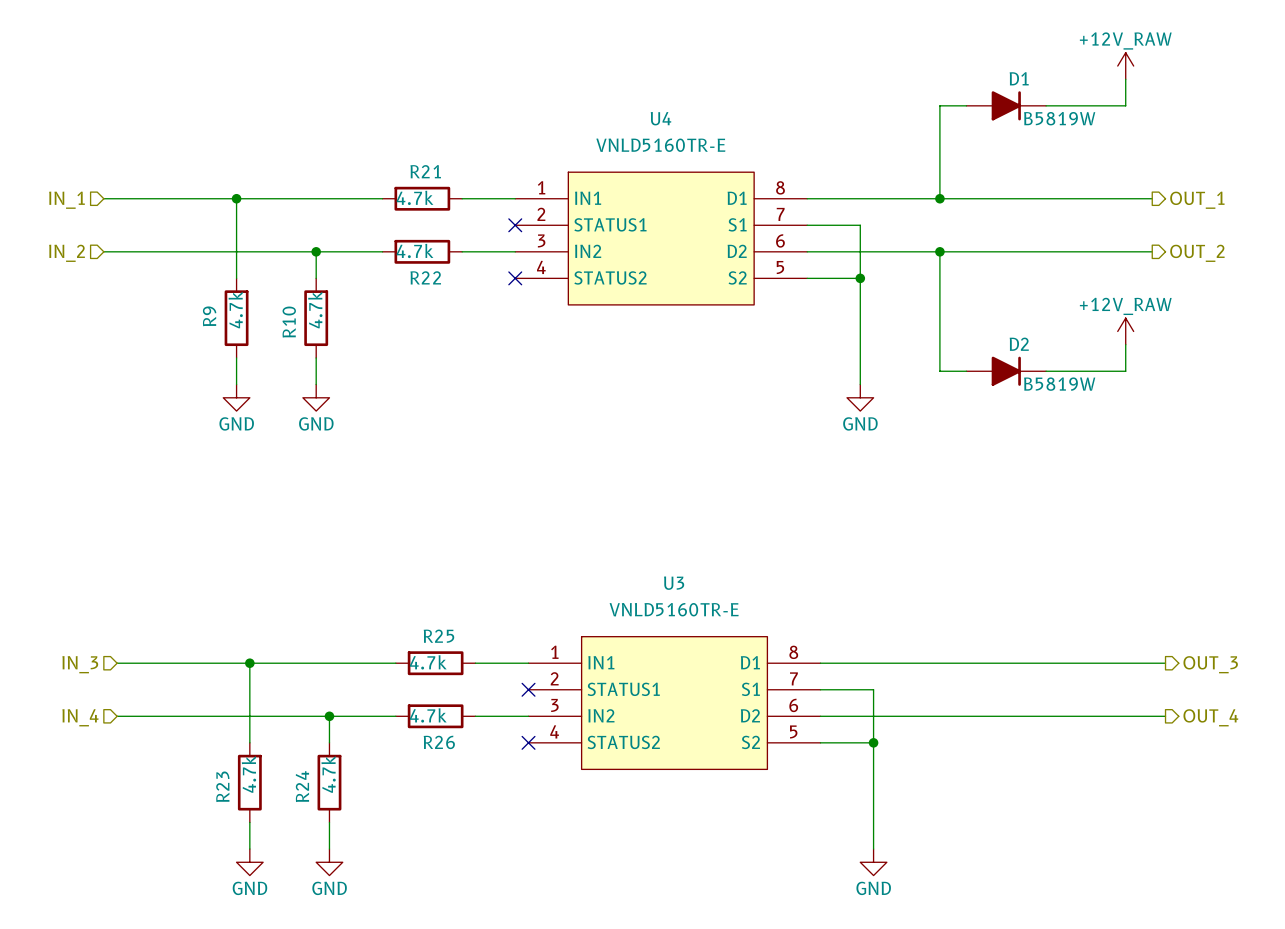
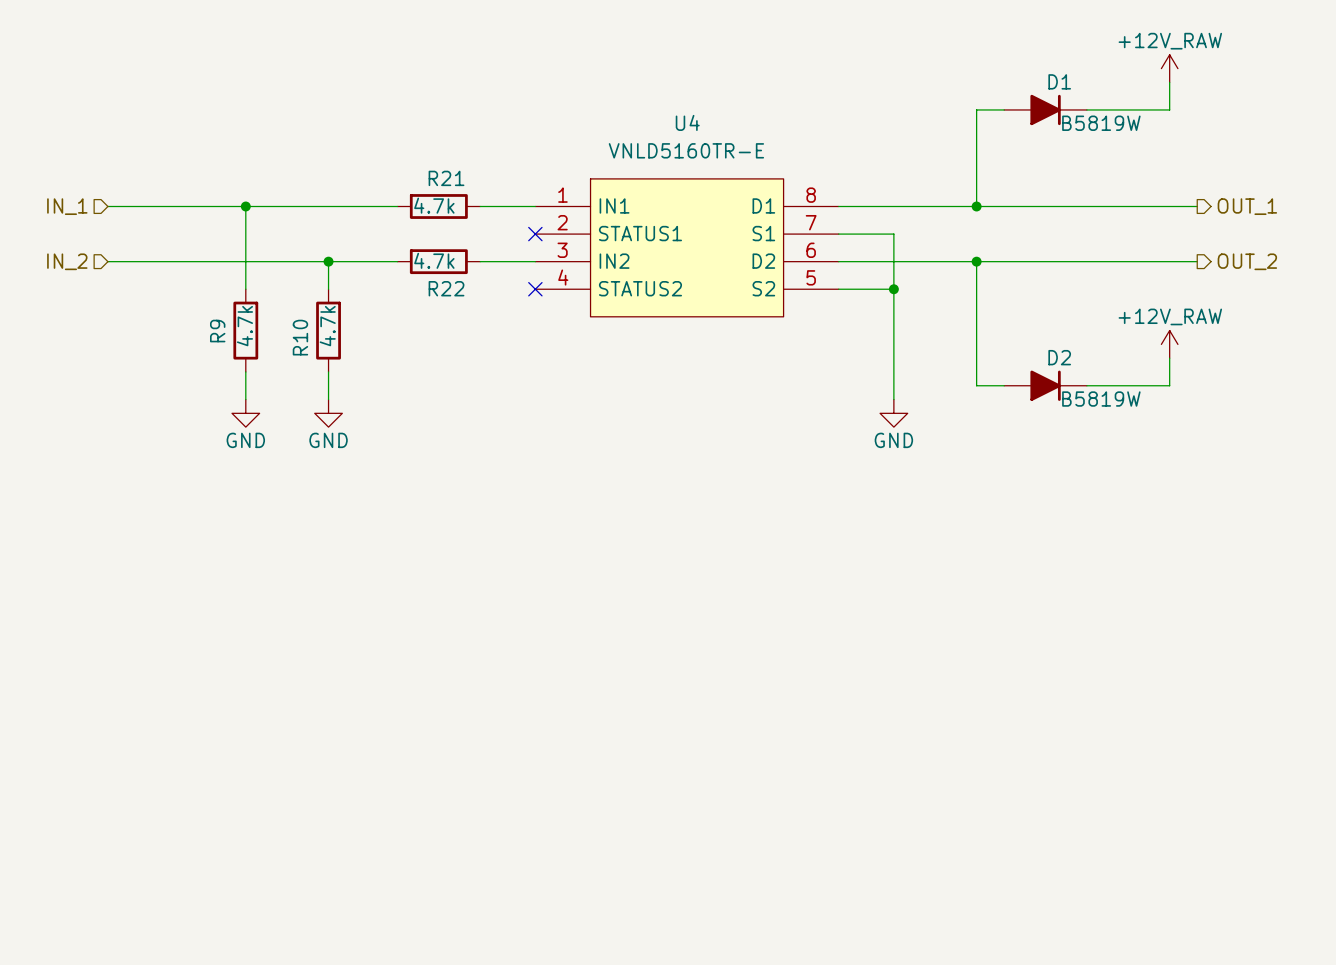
wire: (117, 663) (395, 663) -> none
wire: (249, 663) (249, 742) -> none
junction: (249, 663) -> none
R25: 4.7k (435, 663) -> none
wire: (475, 663) (528, 663) -> none
wire: (820, 663) (1165, 663) -> none
hierarchical label: IN_3 (80, 664) -> none
hierarchical label: OUT_3 (1210, 664) -> none
no-connect mark: (528, 689) -> none
wire: (820, 689) (873, 689) (873, 849) -> none
U3: VNLD5160TR-E (674, 703) -> none
wire: (117, 716) (395, 716) -> none
wire: (329, 716) (329, 742) -> none
junction: (329, 716) -> none
R26: 4.7k (435, 716) -> none
wire: (475, 716) (528, 716) -> none
wire: (820, 716) (1165, 716) -> none
hierarchical label: IN_4 (80, 717) -> none
hierarchical label: OUT_4 (1210, 717) -> none
no-connect mark: (528, 742) -> none
wire: (820, 742) (873, 742) -> none
junction: (873, 742) -> none
R23: 4.7k (249, 782) -> none
R24: 4.7k (329, 782) -> none
wire: (249, 822) (249, 849) -> none
wire: (329, 822) (329, 849) -> none
power symbol: GND (249, 862) -> none
power symbol: GND (329, 862) -> none
power symbol: GND (873, 862) -> none

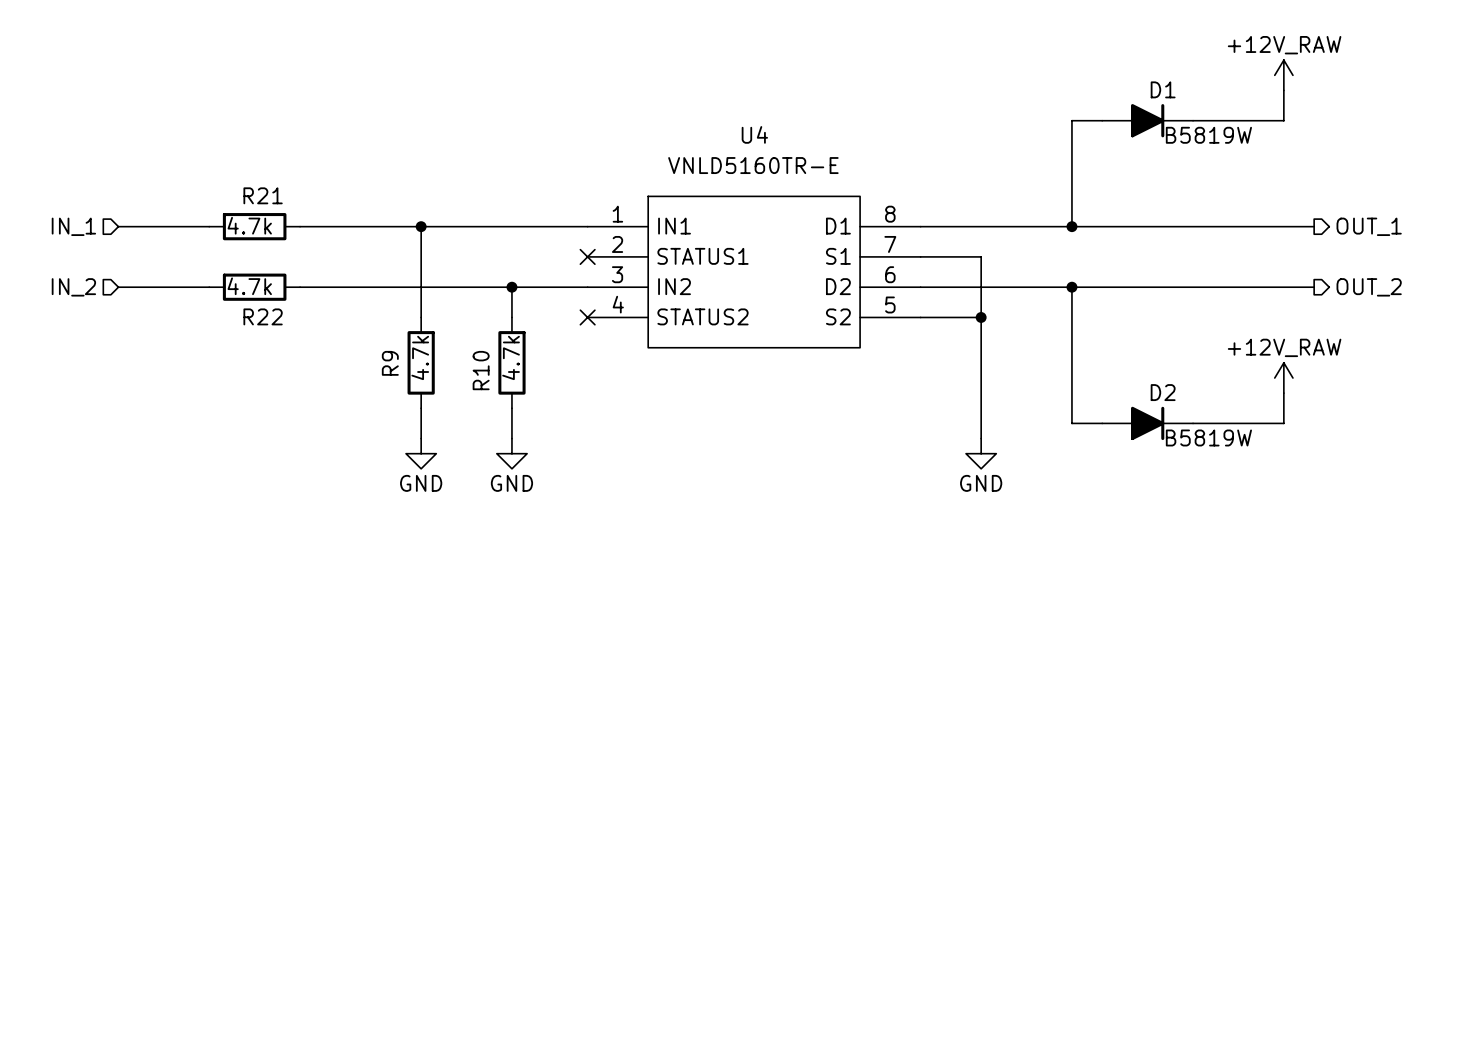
wire: (190, 206) (273, 206) -> (436, 226) (527, 226)
wire: (245, 206) (245, 289) -> (421, 226) (421, 317)
junction: (245, 206) -> none
junction: none -> (421, 226)
R21 position: (438, 206) -> (254, 226)
wire: (190, 261) (273, 261) -> (436, 287) (527, 287)
wire: (328, 261) (328, 289) -> (511, 287) (511, 317)
junction: (328, 261) -> none
R22 position: (438, 261) -> (254, 287)
junction: none -> (511, 287)
R9 position: (245, 330) -> (421, 362)
R10 position: (328, 330) -> (511, 362)
wire: (245, 371) (245, 399) -> (421, 408) (421, 438)
wire: (328, 371) (328, 399) -> (511, 408) (511, 438)
power symbol: GND (245, 413) -> none
power symbol position: GND (328, 413) -> GND (421, 453)
power symbol: none -> GND (511, 453)

